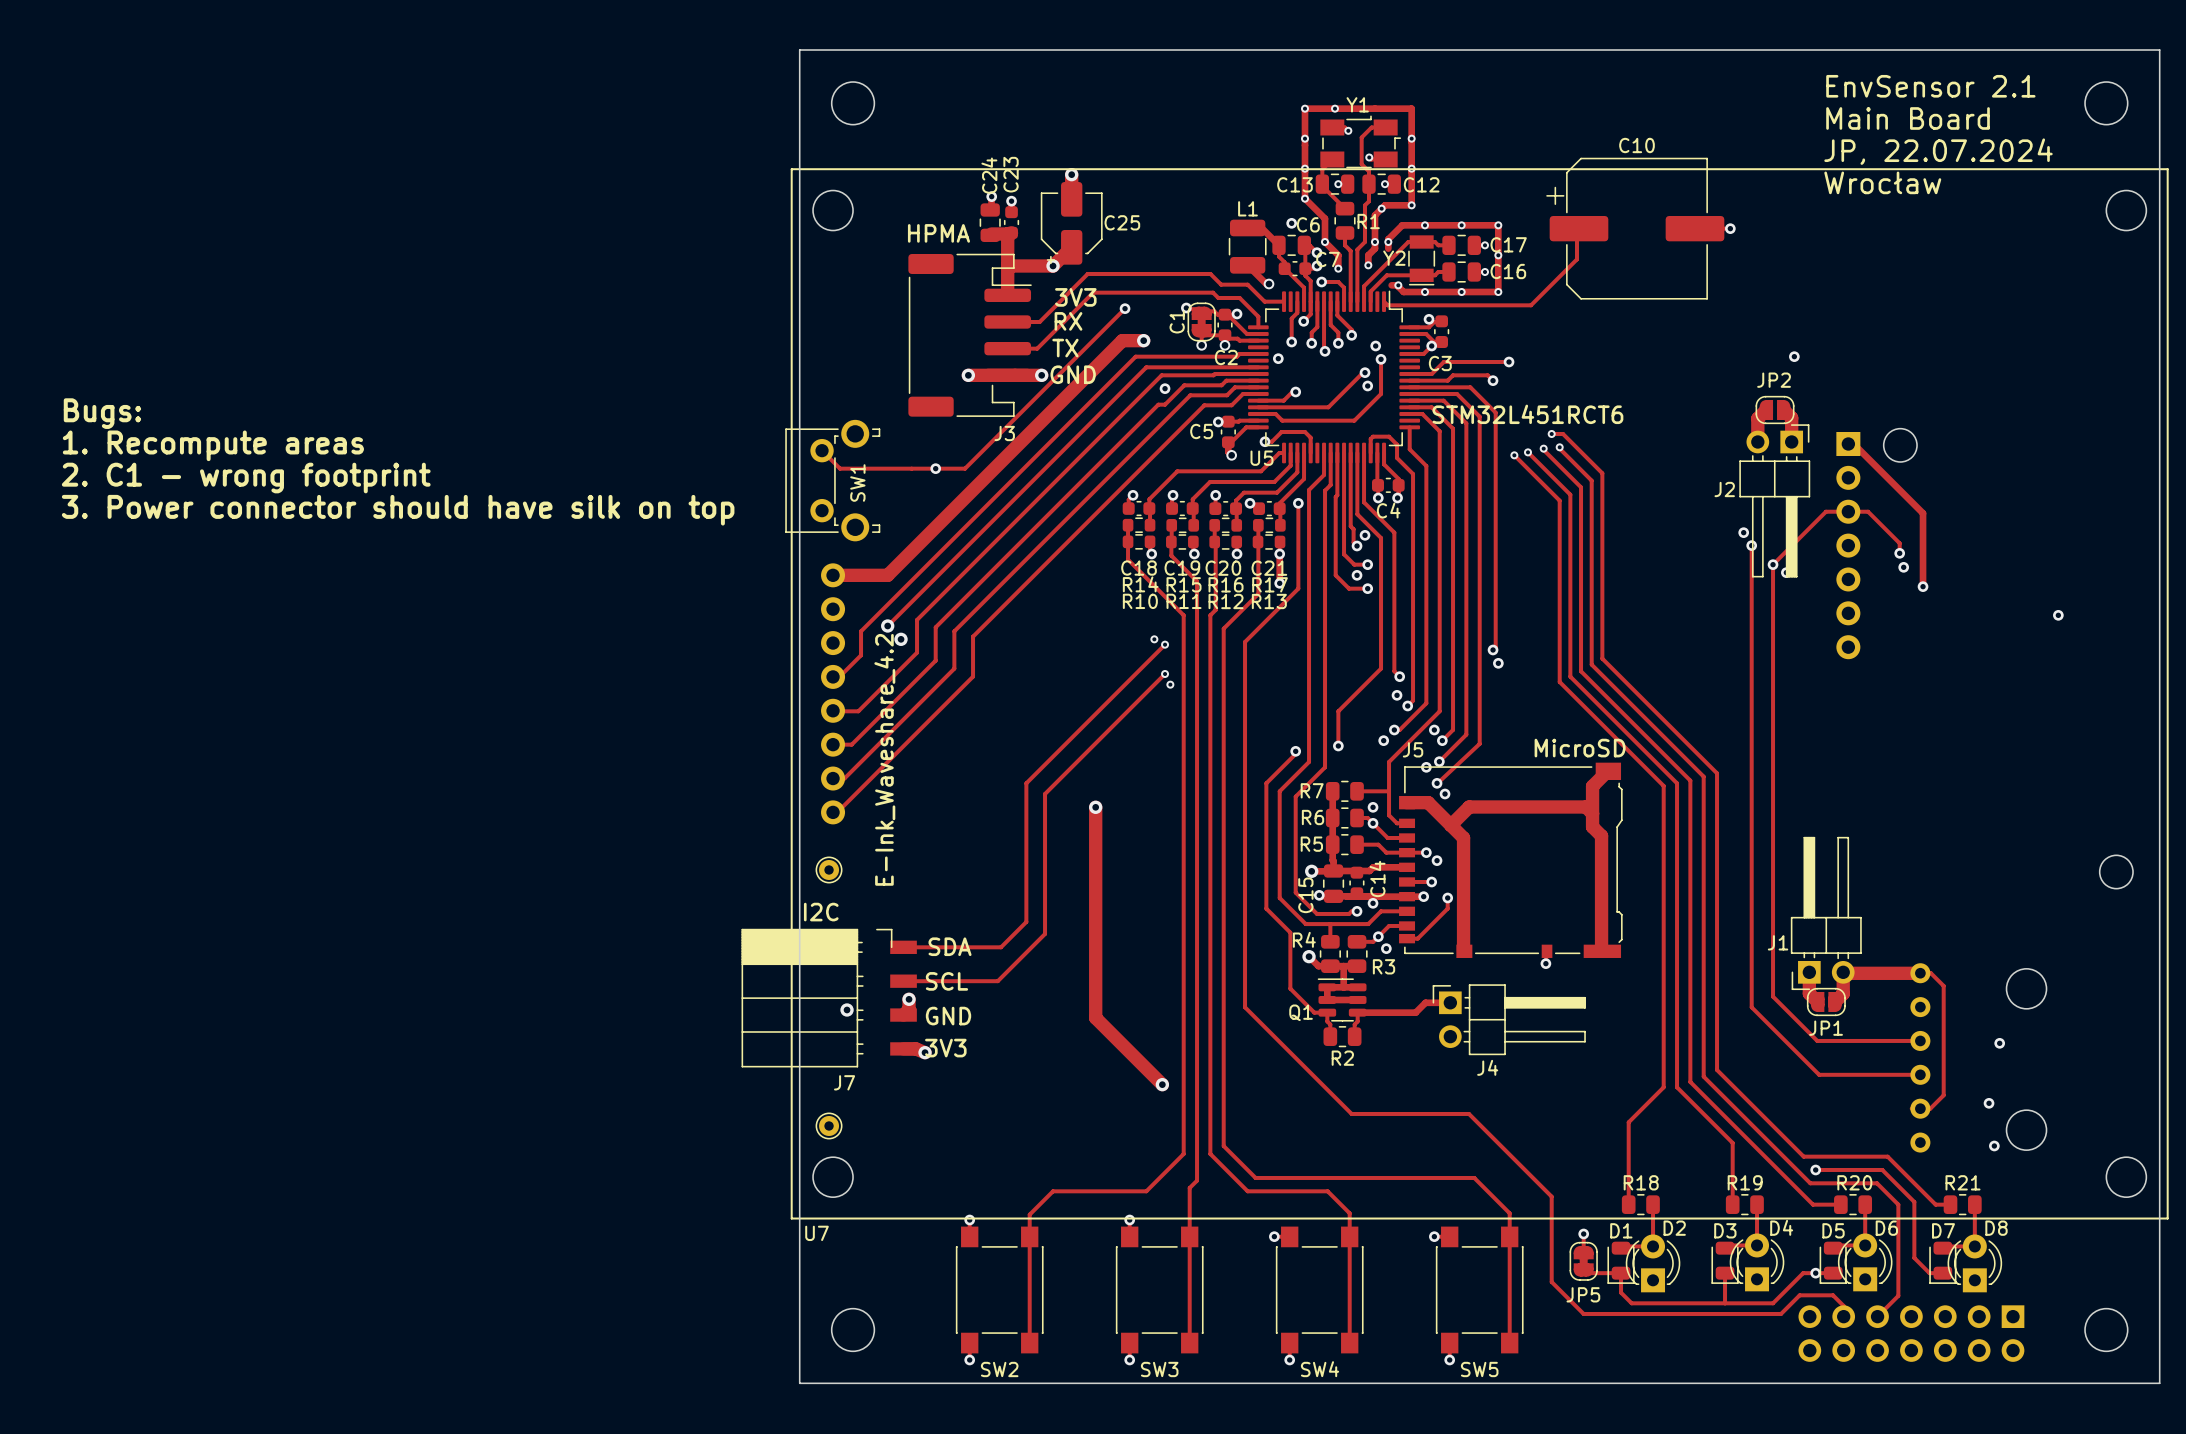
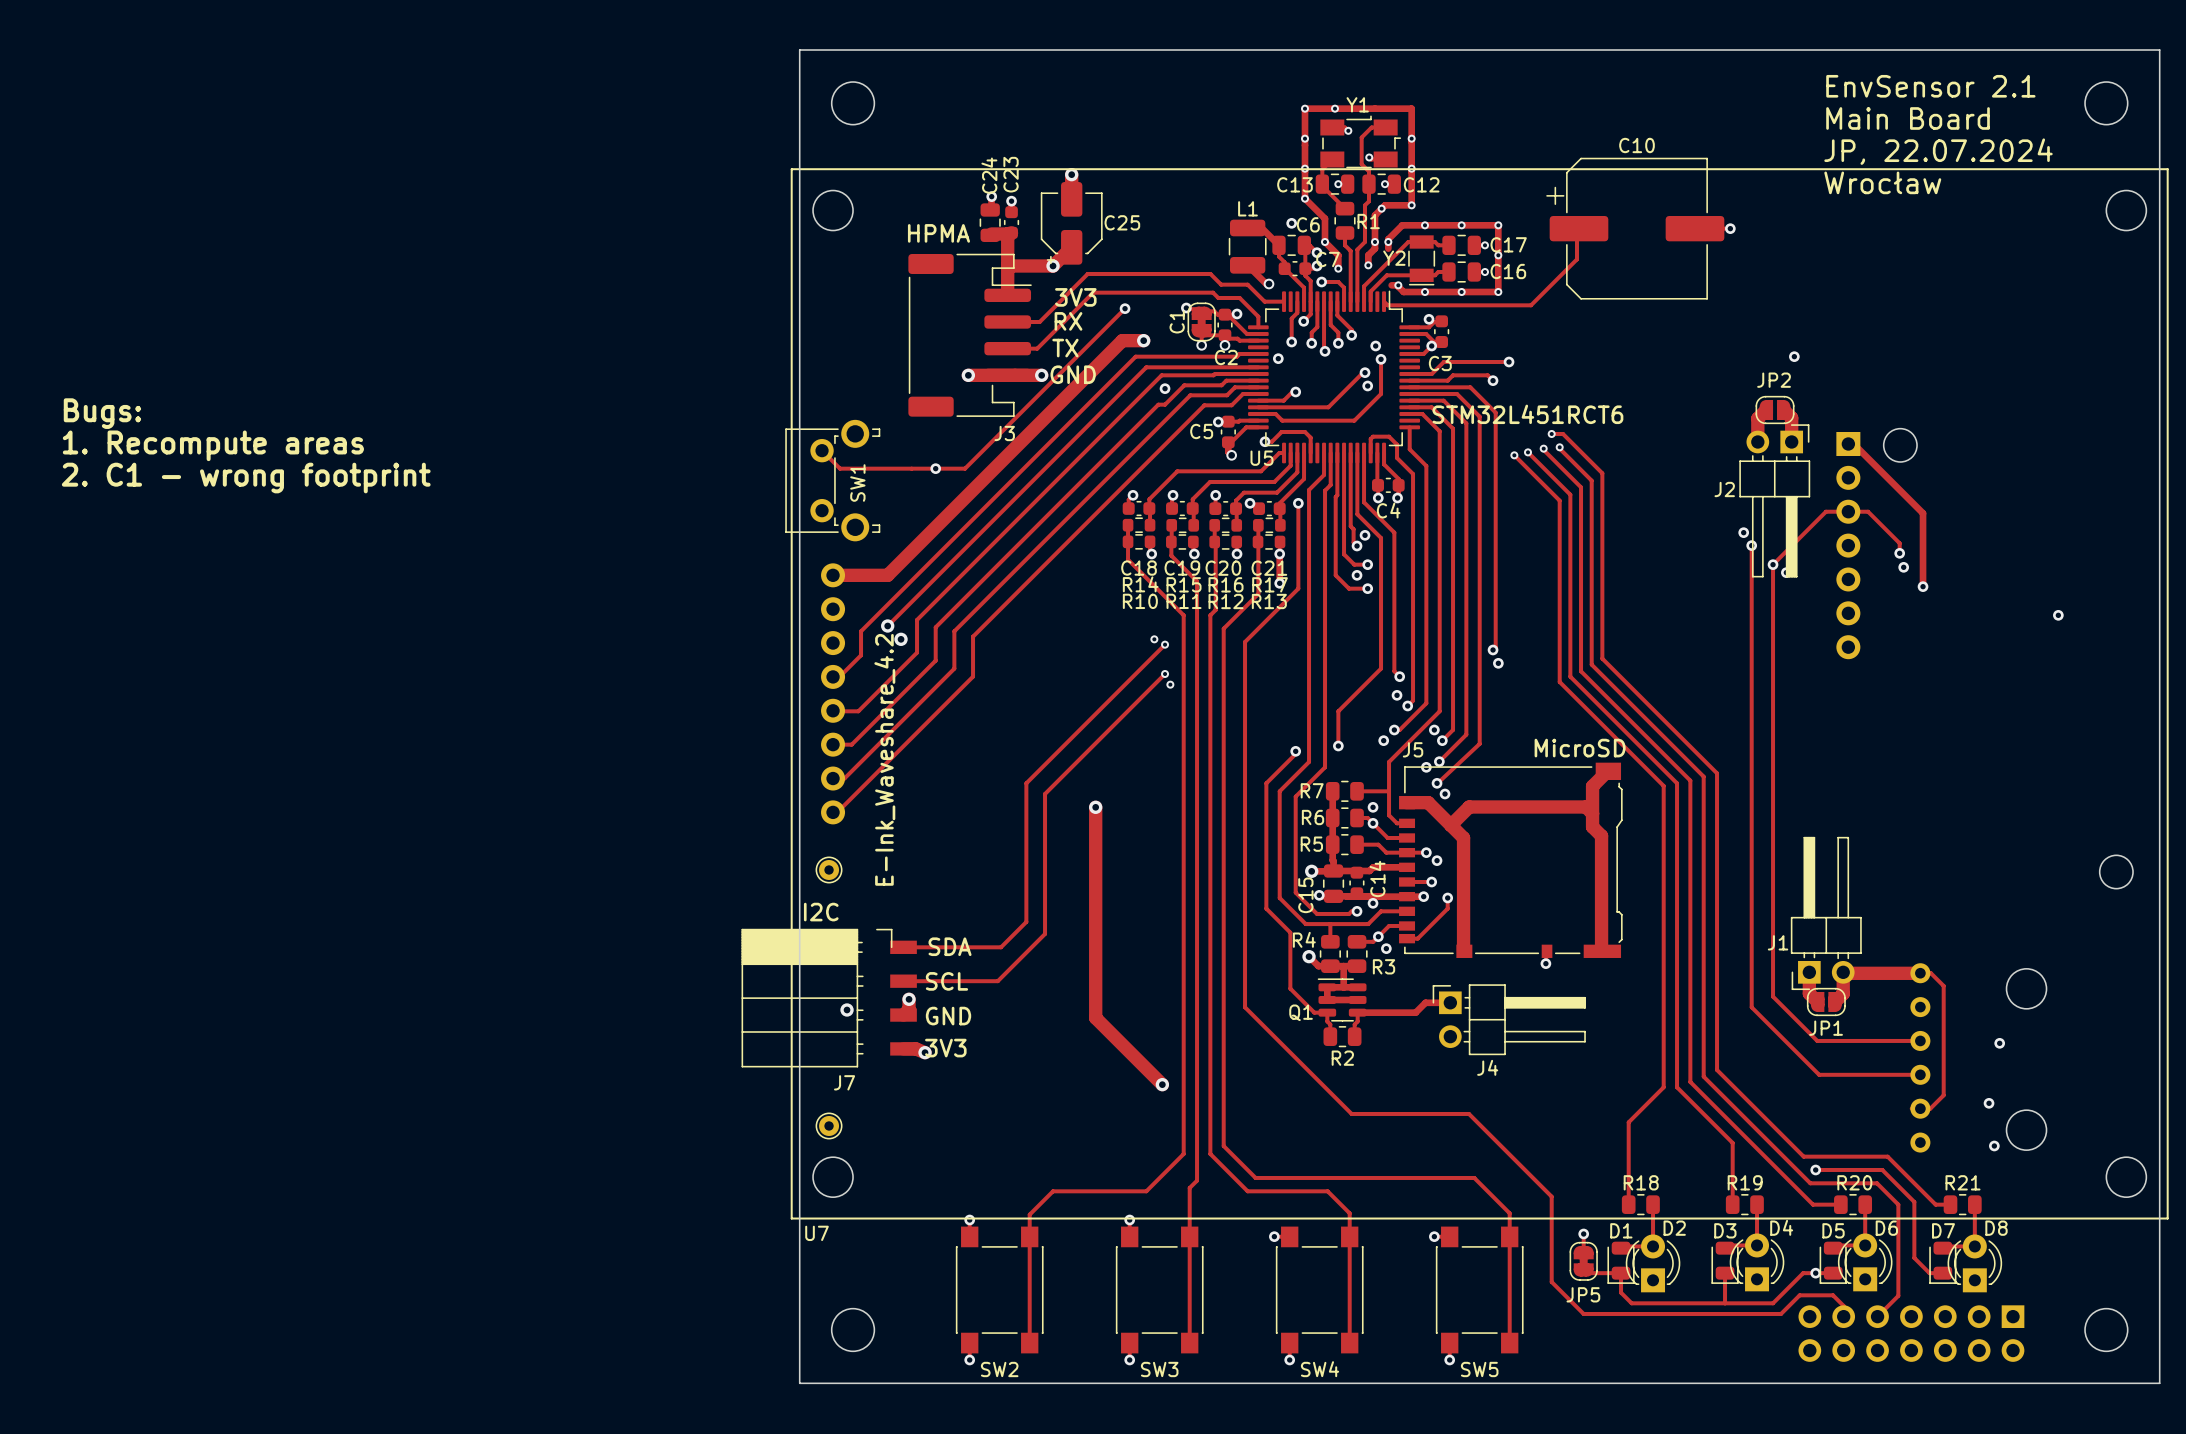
text: 3. Power connector should have silk on top (398, 510) -> none

